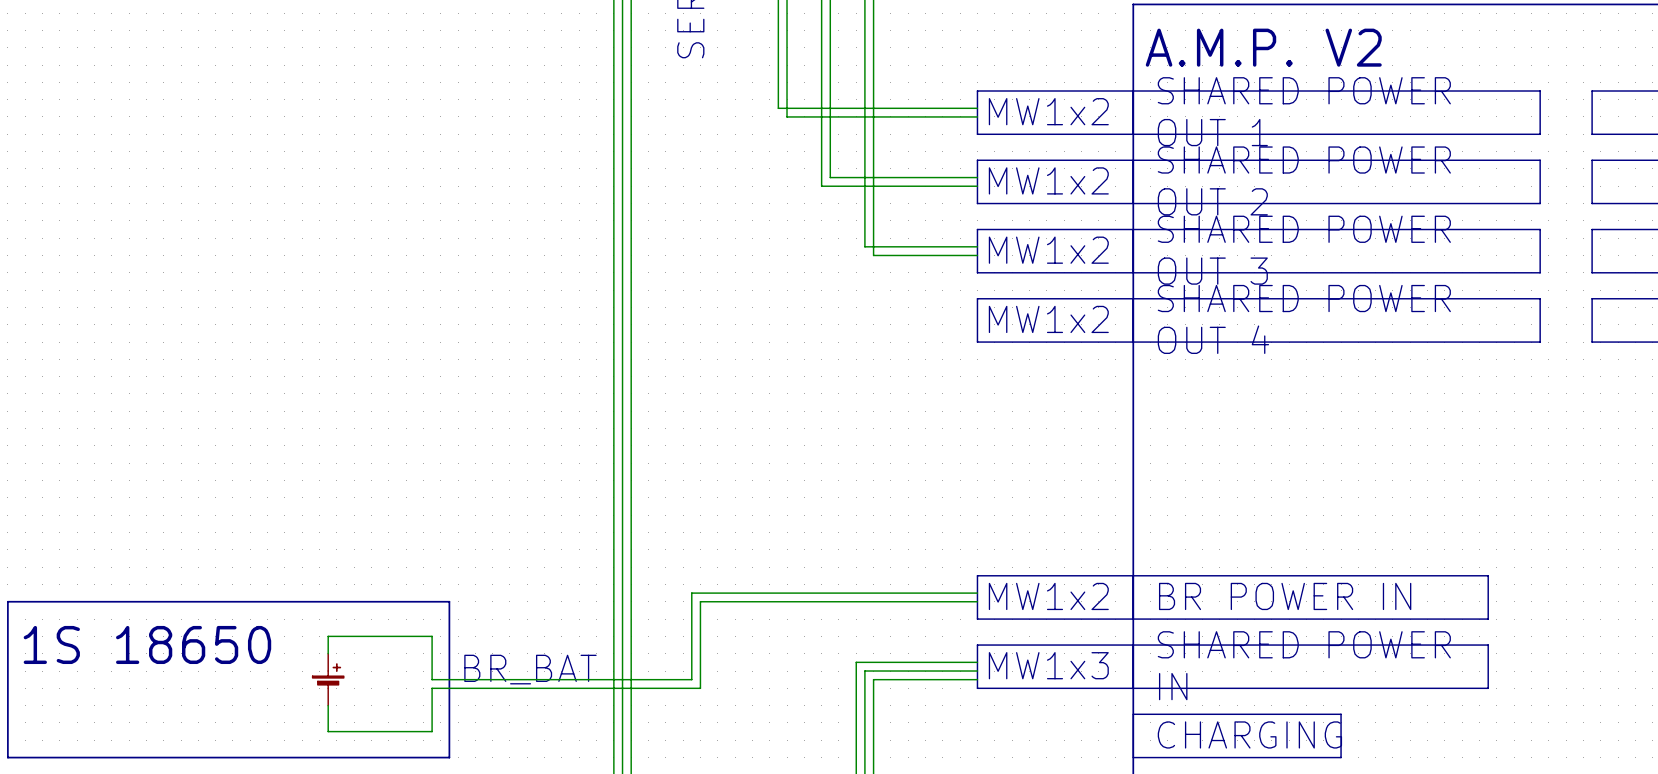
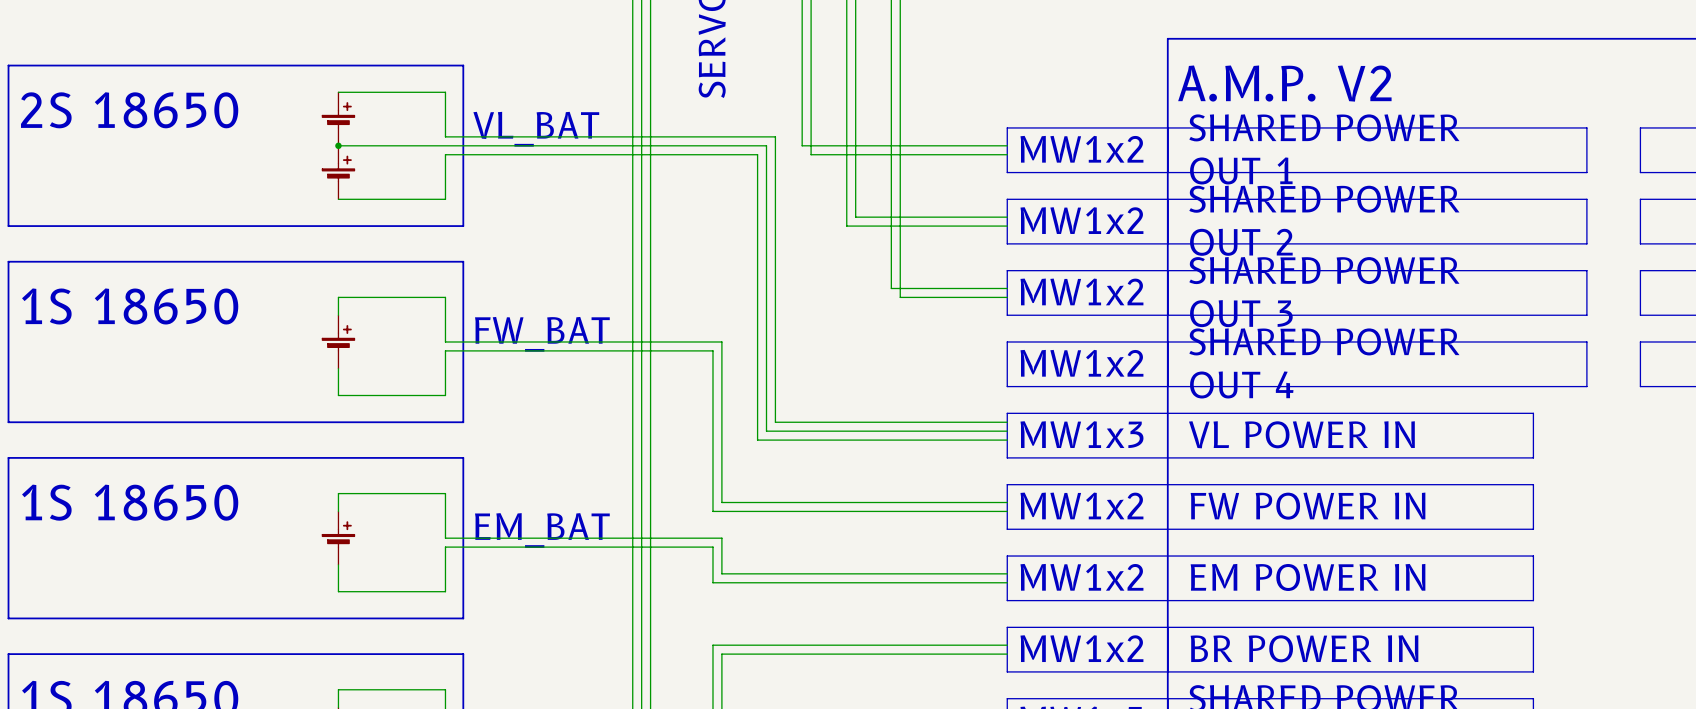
line: none -> (8, 65) (463, 65) (463, 226) (8, 226) (8, 65)
wire: none -> (338, 92) (445, 92) (445, 136) (775, 136) (775, 422) (1007, 422)
text: none -> 2S 18650 (129, 110)
part: none -> (338, 119)
text: none -> VL_BAT (536, 129)
wire: none -> (338, 145) (766, 145) (766, 431) (1007, 431)
junction: none -> (338, 145)
part: none -> (338, 172)
wire: none -> (338, 199) (445, 199) (445, 154) (757, 154) (757, 440) (1007, 440)
line: none -> (8, 261) (8, 422) (463, 422) (463, 261) (8, 261)
text: none -> 1S 18650 (130, 306)
wire: none -> (338, 315) (338, 297) (445, 297) (445, 341) (721, 341) (721, 502) (1007, 502)
text: none -> FW_BAT (542, 334)
part: none -> (338, 341)
wire: none -> (338, 368) (338, 395) (445, 395) (445, 350) (712, 350) (712, 511) (1007, 511)
line: none -> (1007, 413) (1007, 457) (1533, 457) (1533, 413) (1007, 413)
text: none -> MW1x3 (1081, 434)
text: none -> VL POWER IN (1301, 434)
line: none -> (8, 457) (8, 618) (463, 618) (463, 457) (8, 457)
line: none -> (1007, 484) (1007, 529) (1533, 529) (1533, 484) (1007, 484)
text: none -> 1S 18650 (130, 502)
text: none -> MW1x2 (1081, 505)
text: none -> FW POWER IN (1308, 506)
wire: none -> (338, 511) (338, 493) (445, 493) (445, 538) (721, 538) (721, 573) (1007, 573)
text: none -> EM_BAT (542, 530)
part: none -> (338, 538)
line: none -> (1007, 556) (1007, 600) (1533, 600) (1533, 556) (1007, 556)
wire: none -> (338, 564) (338, 591) (445, 591) (445, 547) (712, 547) (712, 582) (1007, 582)
text: none -> MW1x2 (1081, 577)
text: none -> EM POWER IN (1308, 577)

